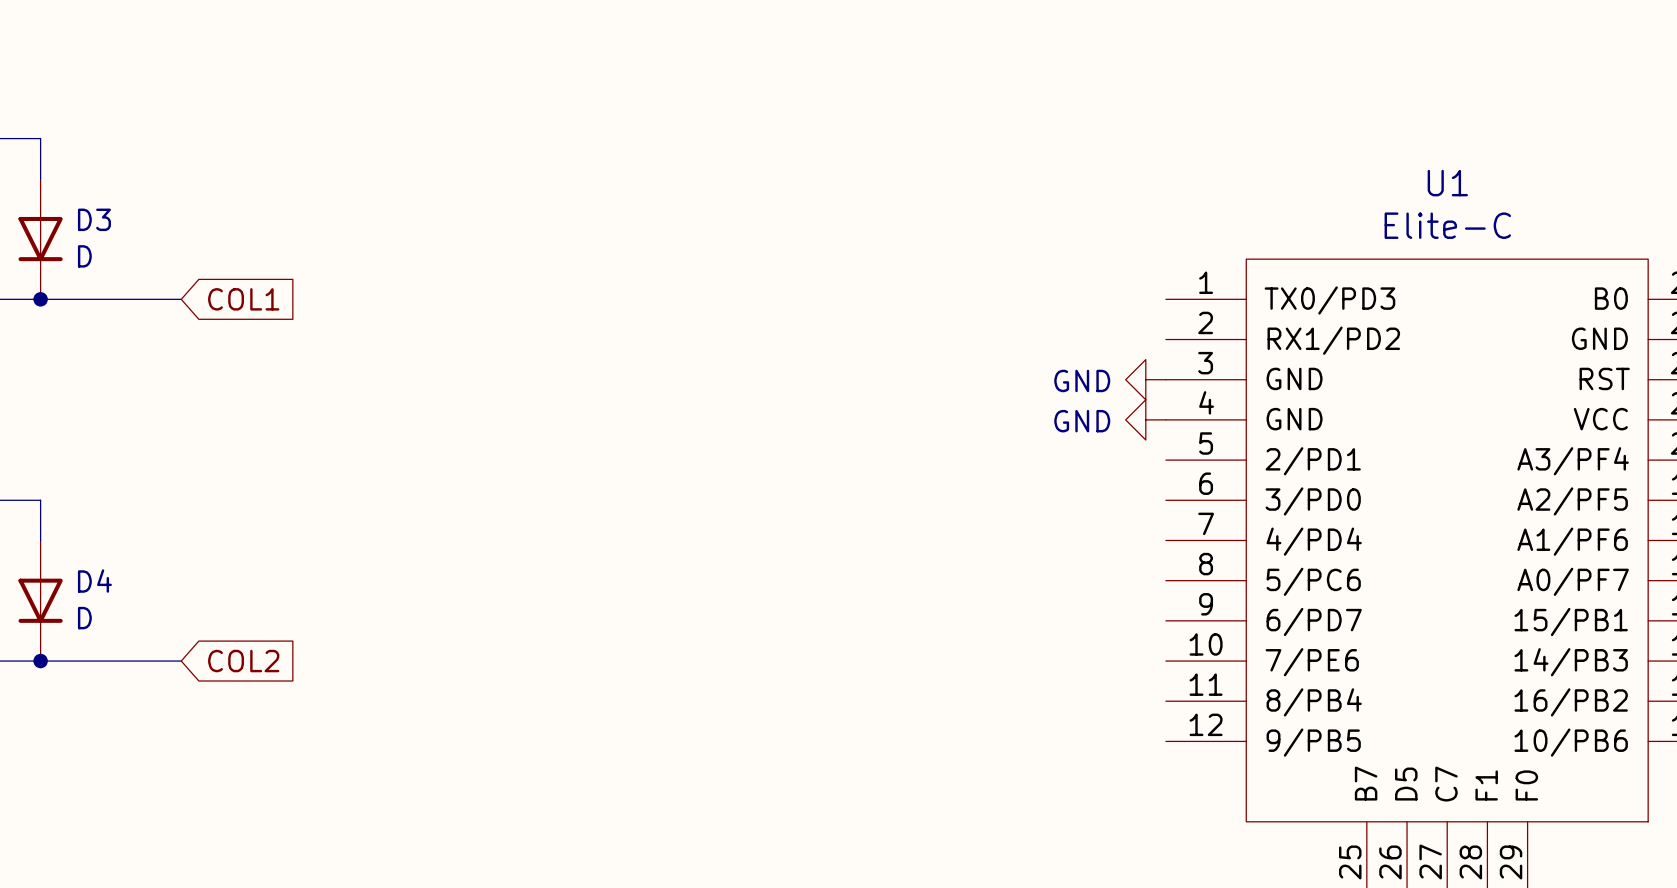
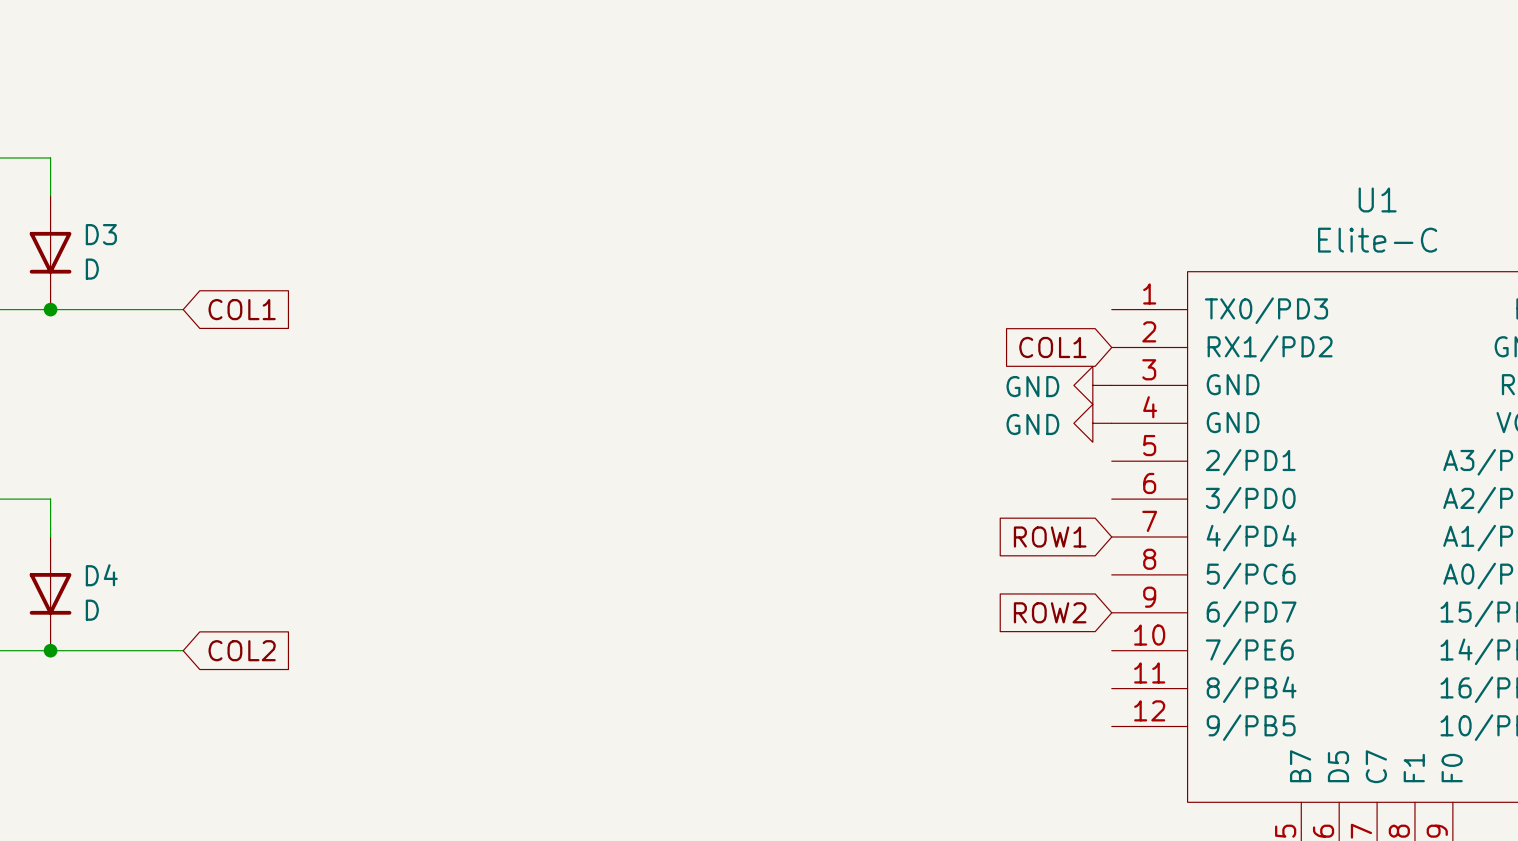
global label: none -> COL1 (1052, 347)
global label: none -> ROW1 (1050, 537)
global label: none -> ROW2 (1050, 612)

